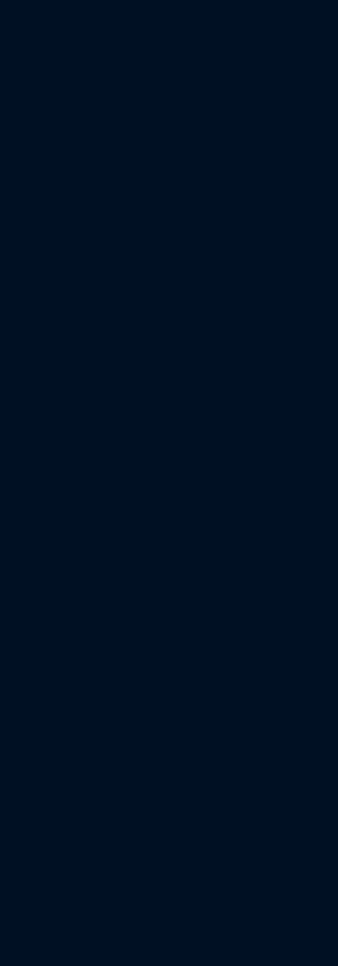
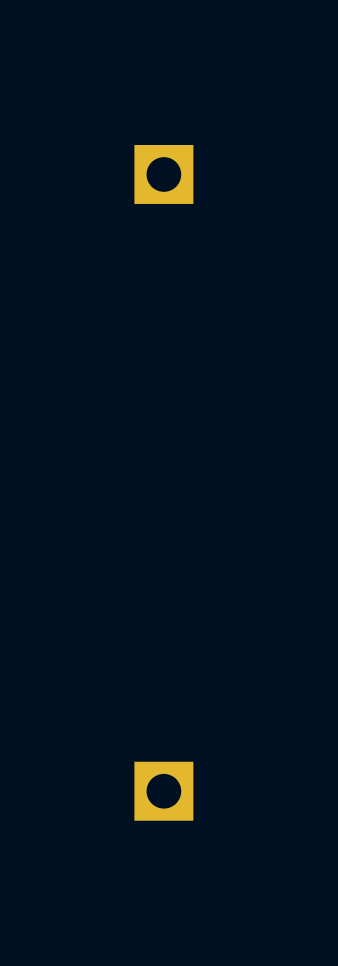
part: none -> (163, 174)
part: none -> (163, 791)

